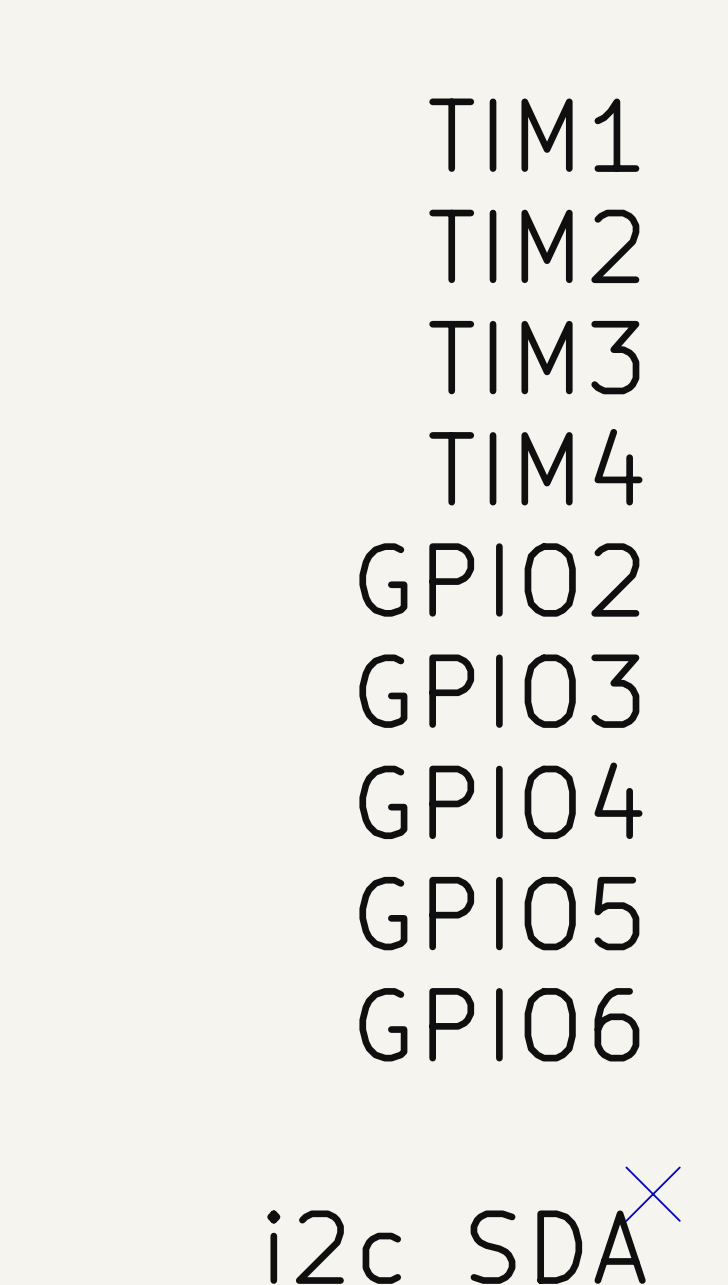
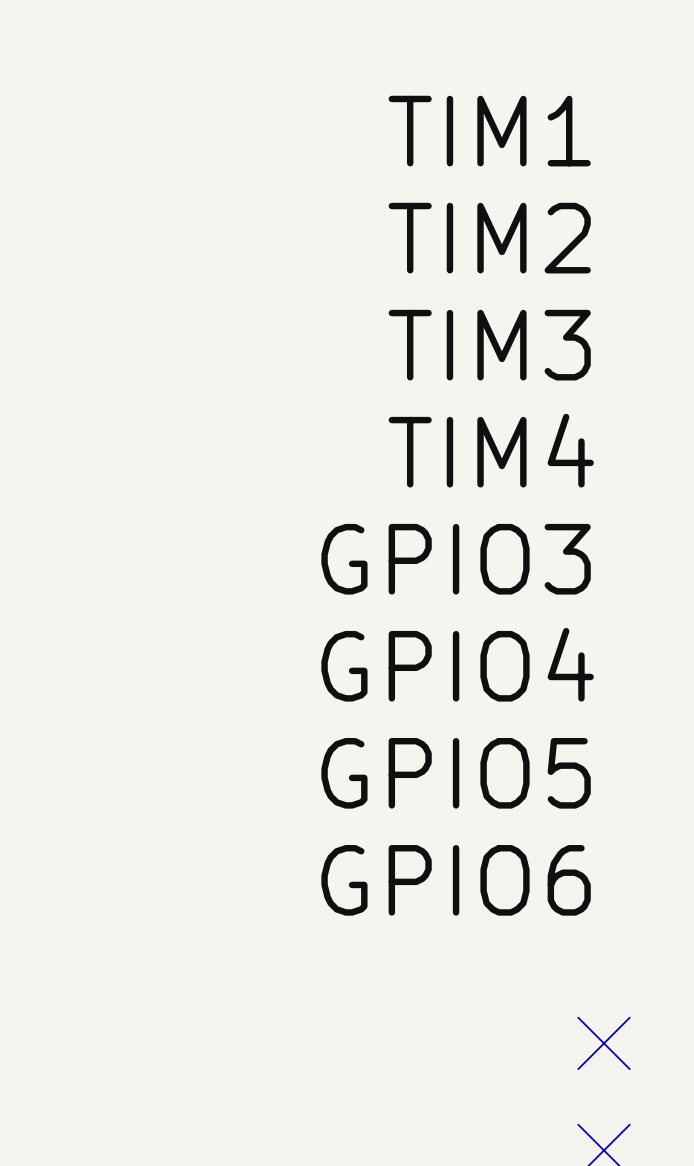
label: GPIO2 (499, 579) -> GPIO3 (456, 559)
label: GPIO3 (499, 691) -> GPIO4 (457, 664)
label: GPIO4 (500, 800) -> GPIO5 (456, 773)
label: GPIO5 (499, 913) -> GPIO6 (456, 880)
label: GPIO6 (499, 1024) -> none
no-connect mark: none -> (604, 1043)

